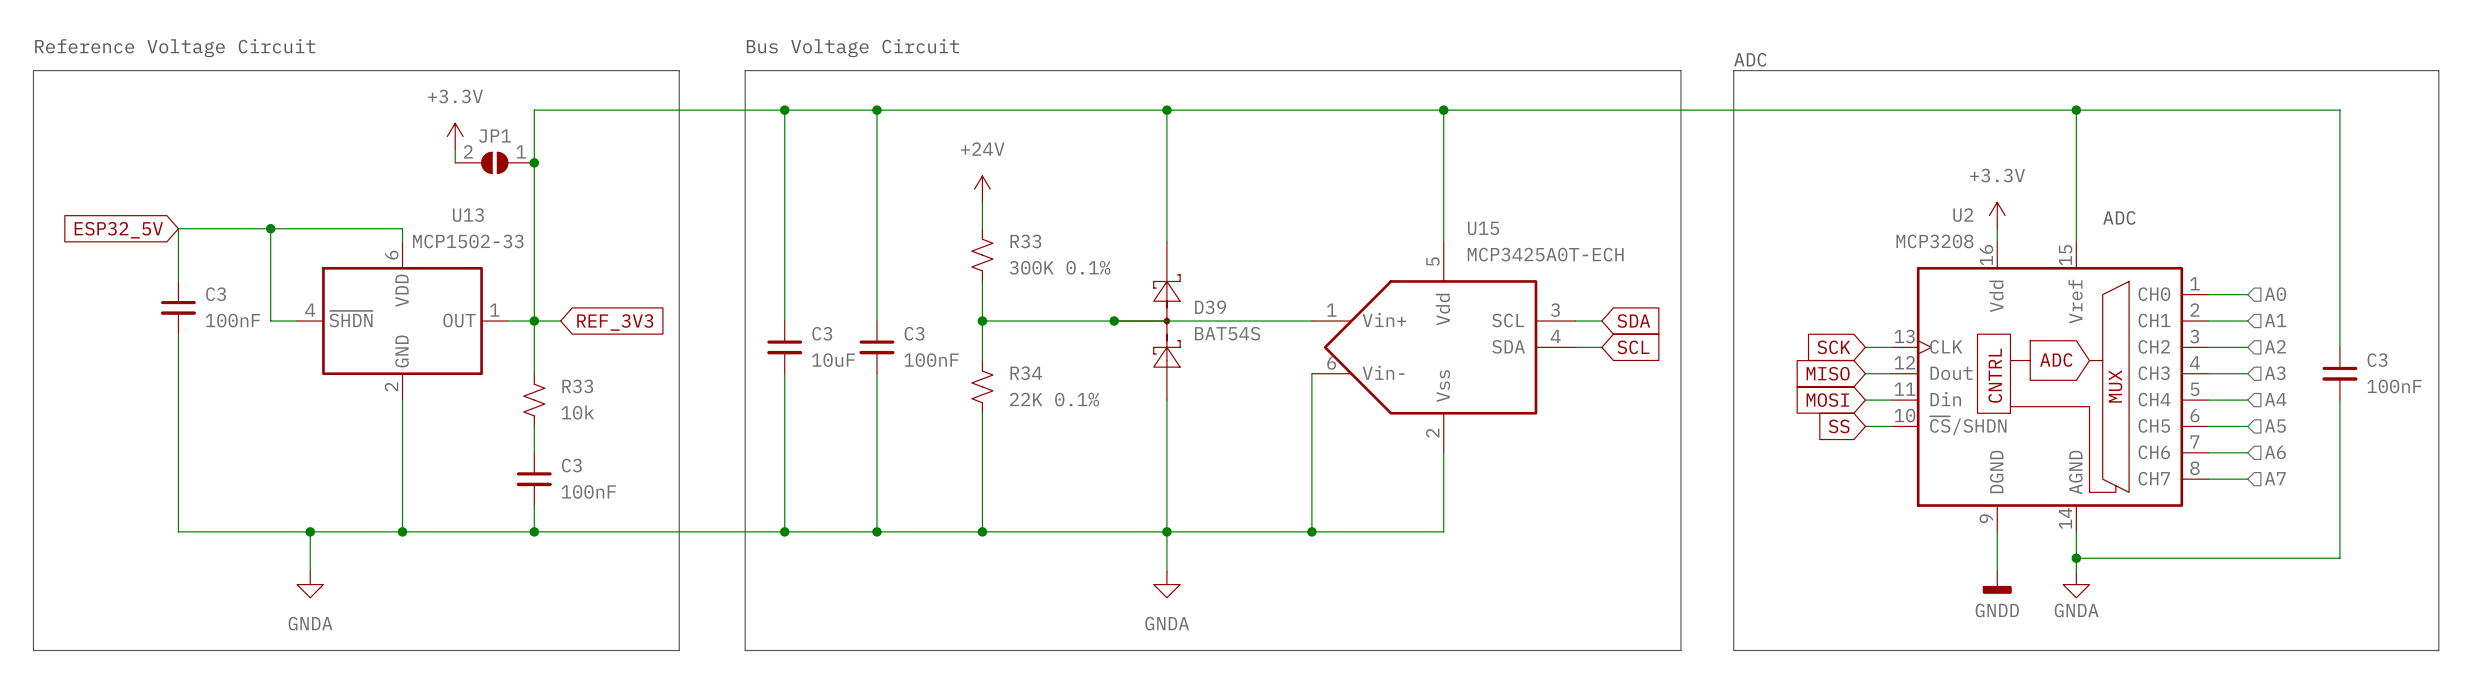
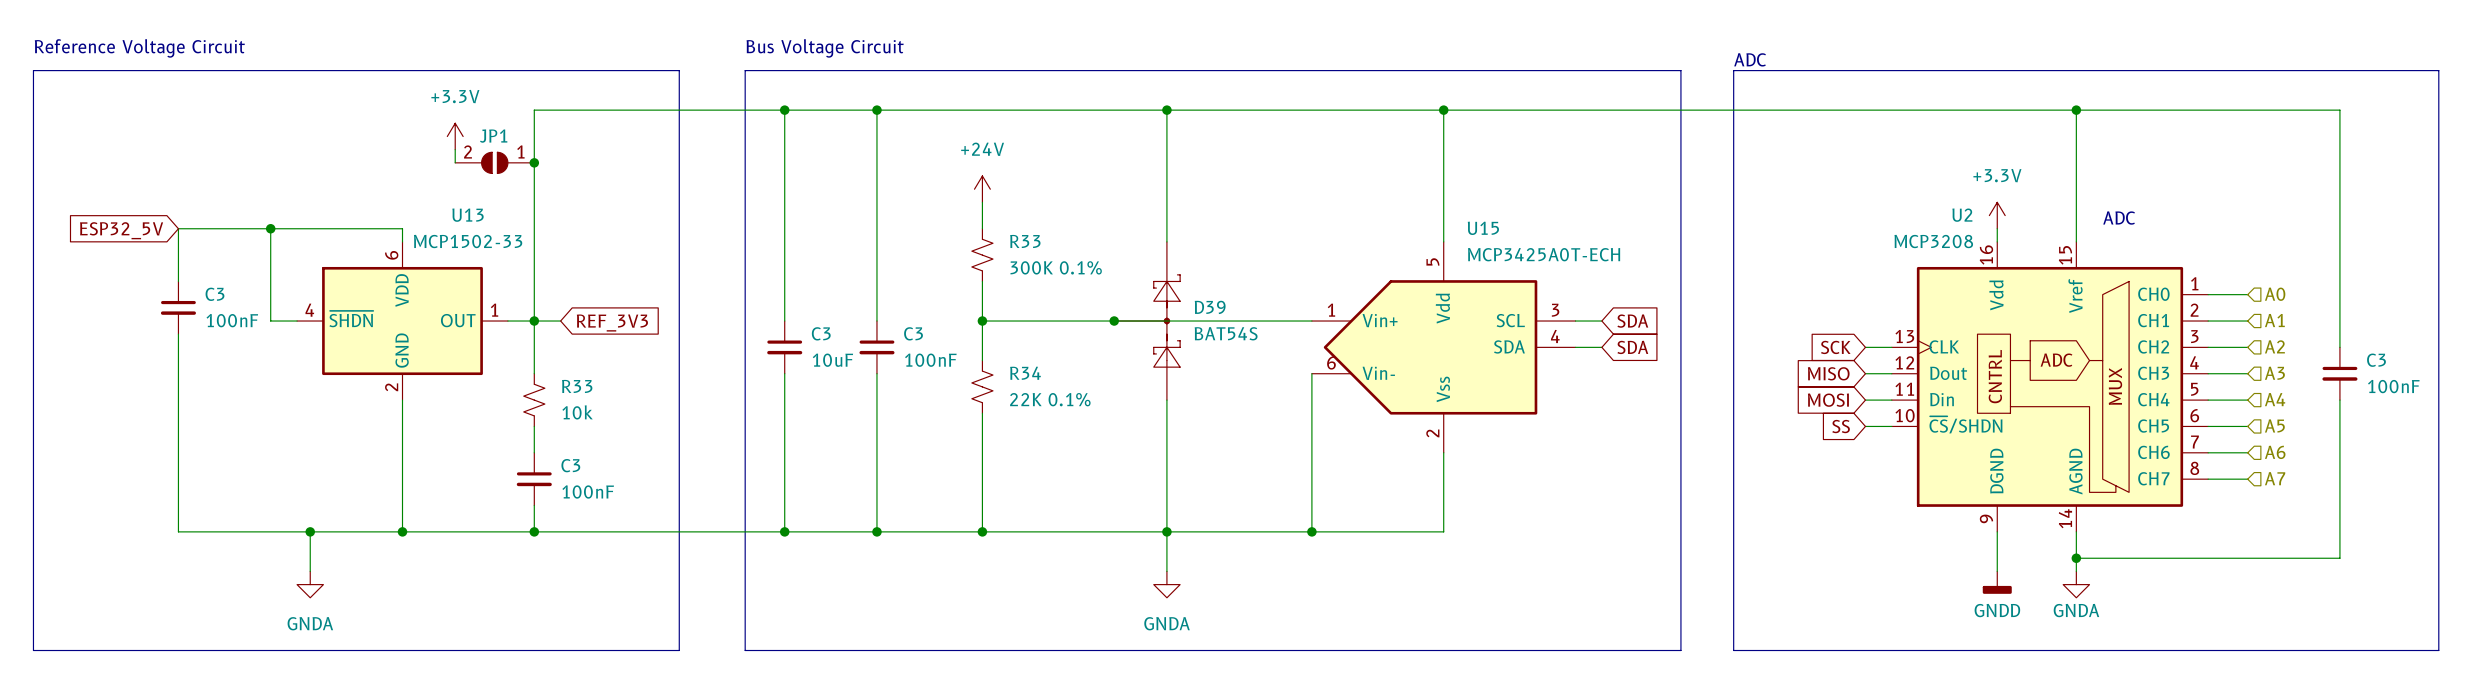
global label: SCL (1633, 347) -> SDA (1632, 347)

